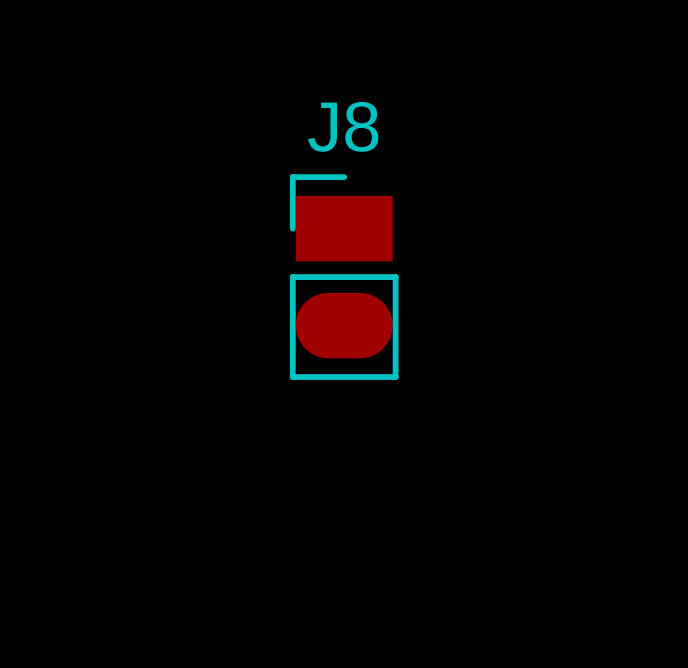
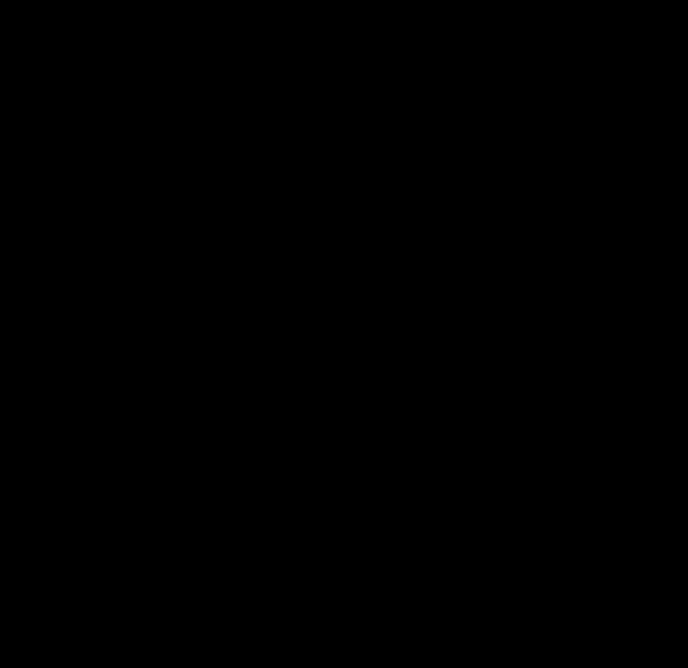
J8: (344, 277) -> none

